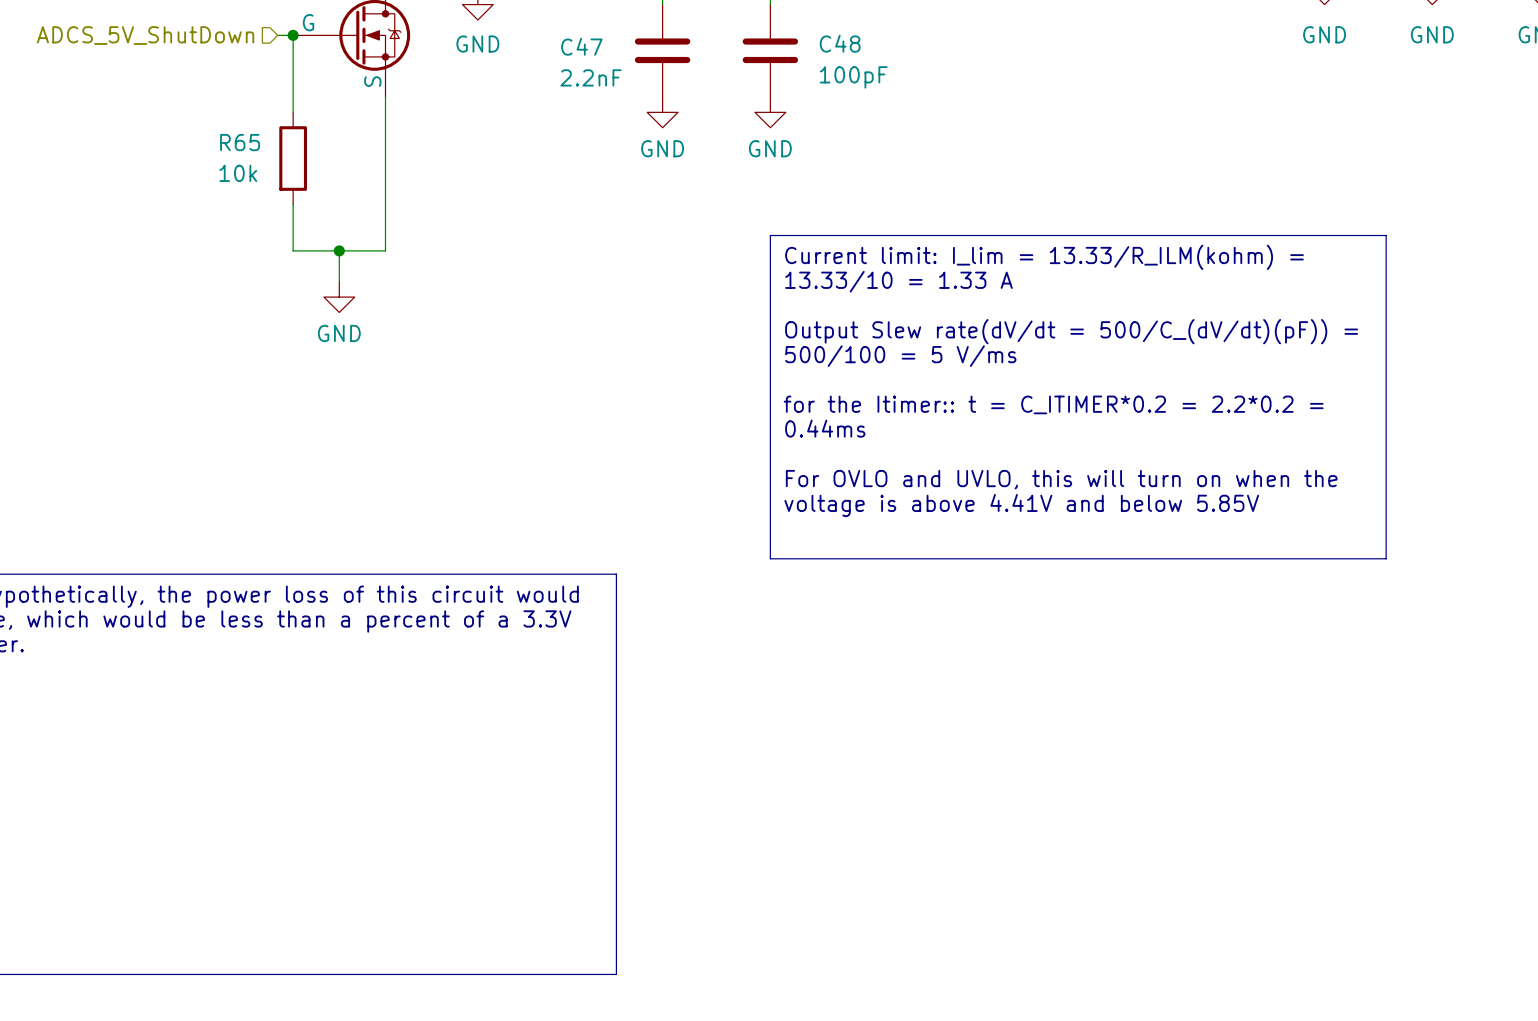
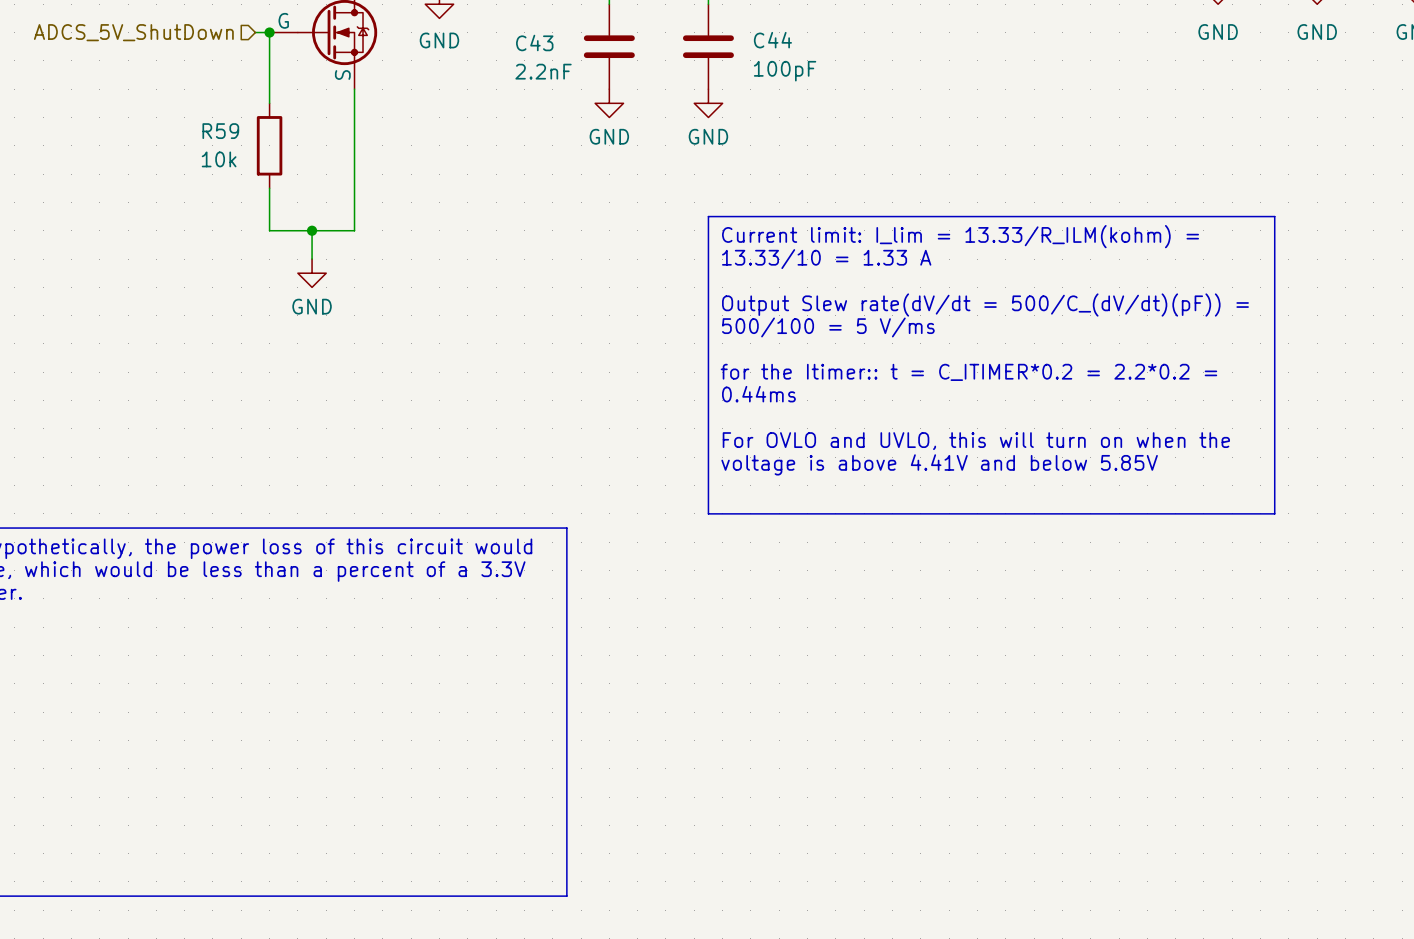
C48 name: C48 (840, 43) -> C44 (772, 40)
C47 name: C47 (581, 46) -> C43 (534, 42)
R65 name: R65 (240, 142) -> R59 (220, 131)

